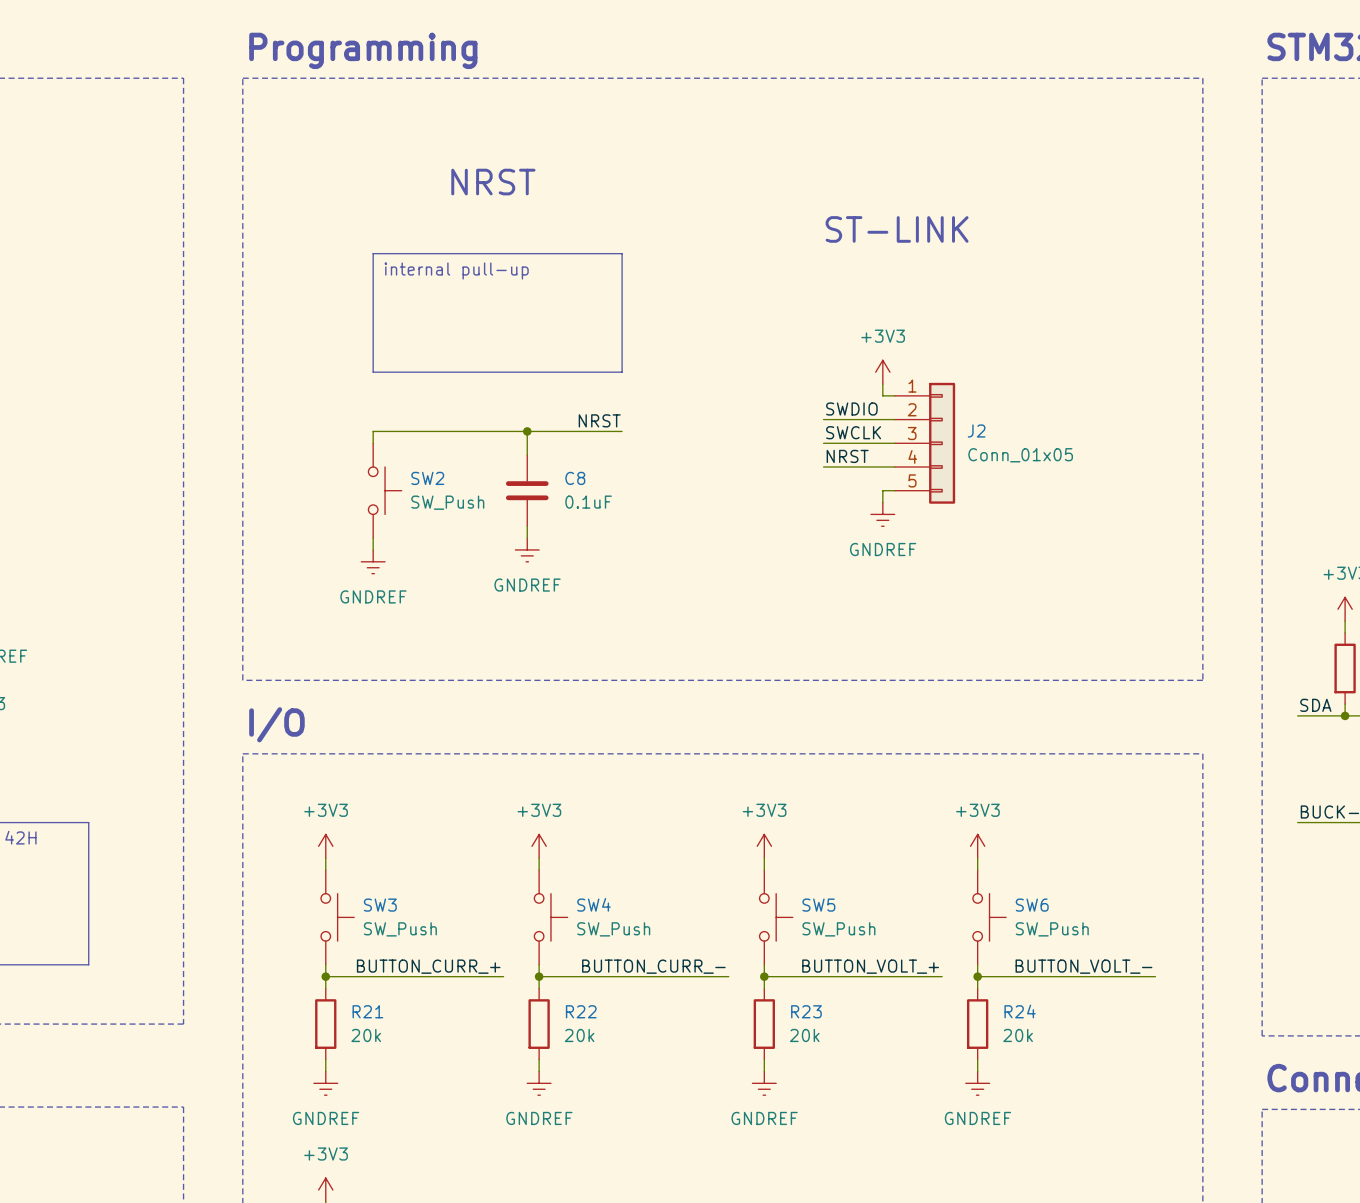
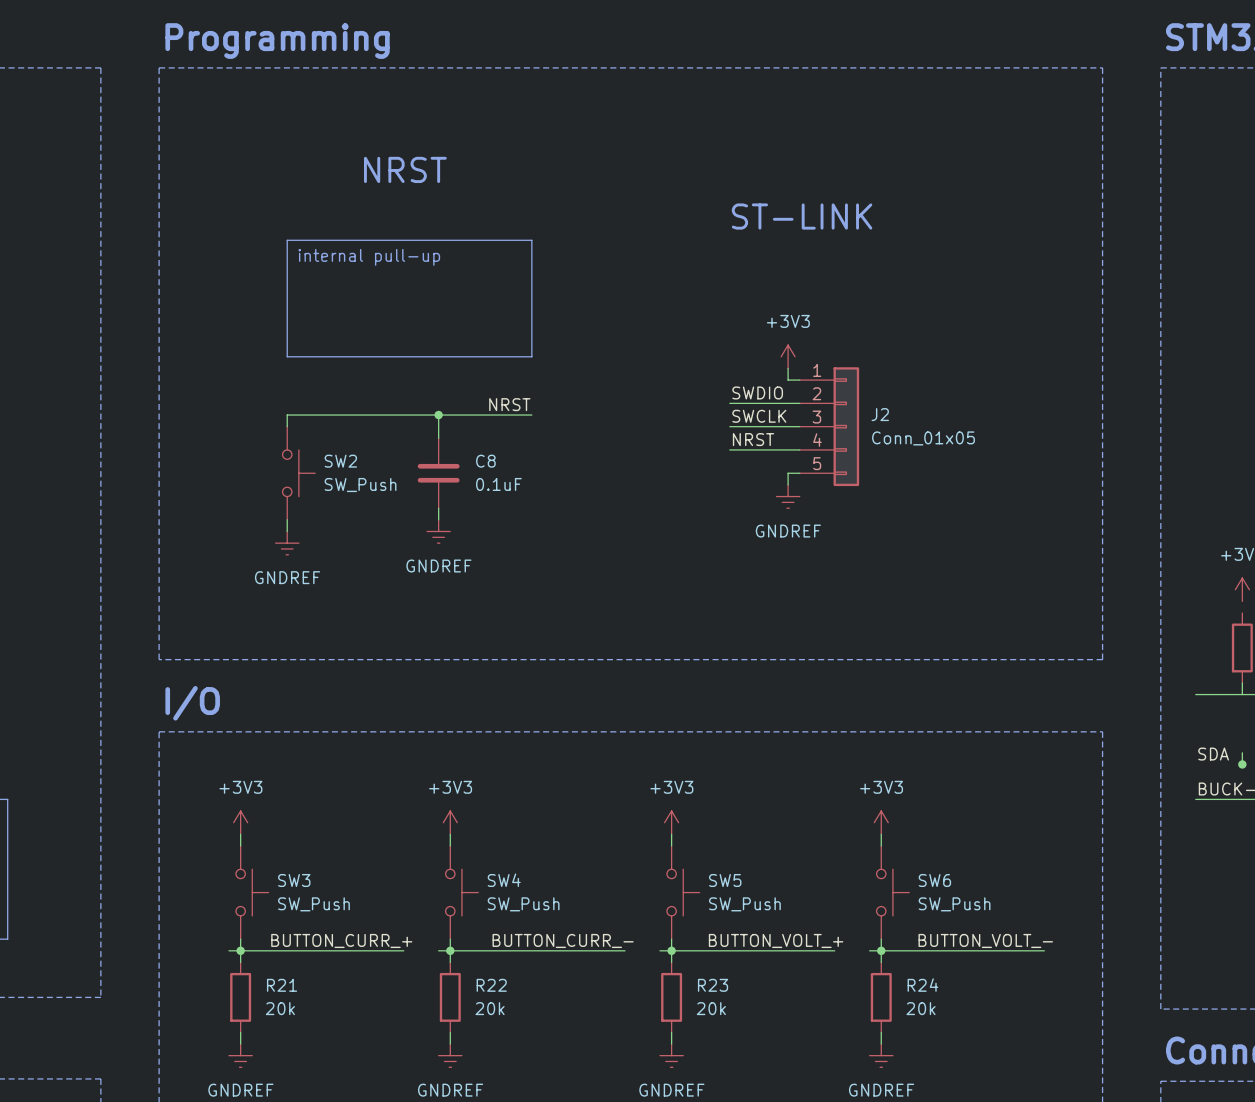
wire: (1345, 621) (1345, 632) -> (1242, 752) (1242, 764)
label position: SDA (1315, 705) -> SDA (1213, 754)
junction: (1345, 715) -> none
junction: none -> (1242, 764)
wire: none -> (228, 950) (240, 950)
wire: (491, 976) (503, 976) -> (438, 950) (450, 950)
wire: (716, 976) (728, 976) -> (659, 950) (671, 950)
wire: (930, 976) (942, 976) -> (869, 950) (881, 950)
wire: (1143, 976) (1155, 976) -> none

